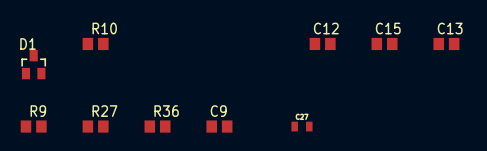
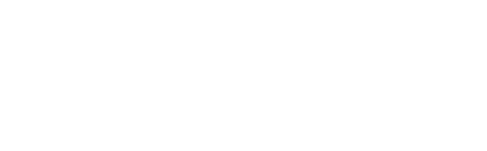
R10: (95, 43) -> none
C12: (322, 43) -> none
C15: (384, 43) -> none
C13: (446, 43) -> none
D1: (33, 64) -> none
R9: (33, 126) -> none
R27: (95, 126) -> none
R36: (157, 126) -> none
C9: (219, 126) -> none
part: (301, 126) -> none

